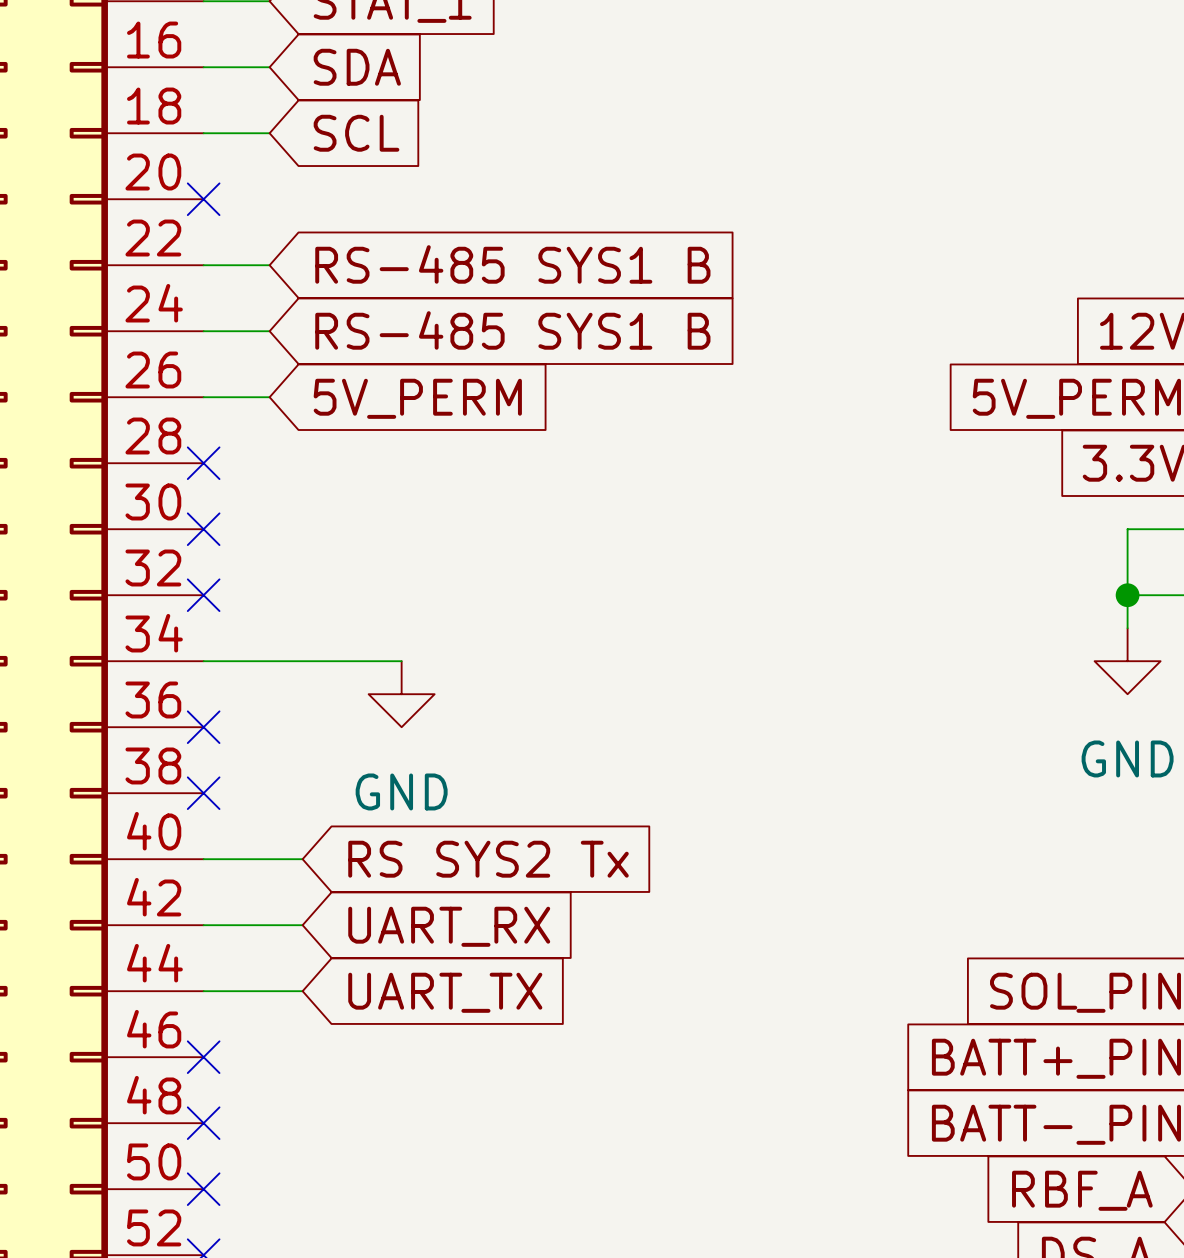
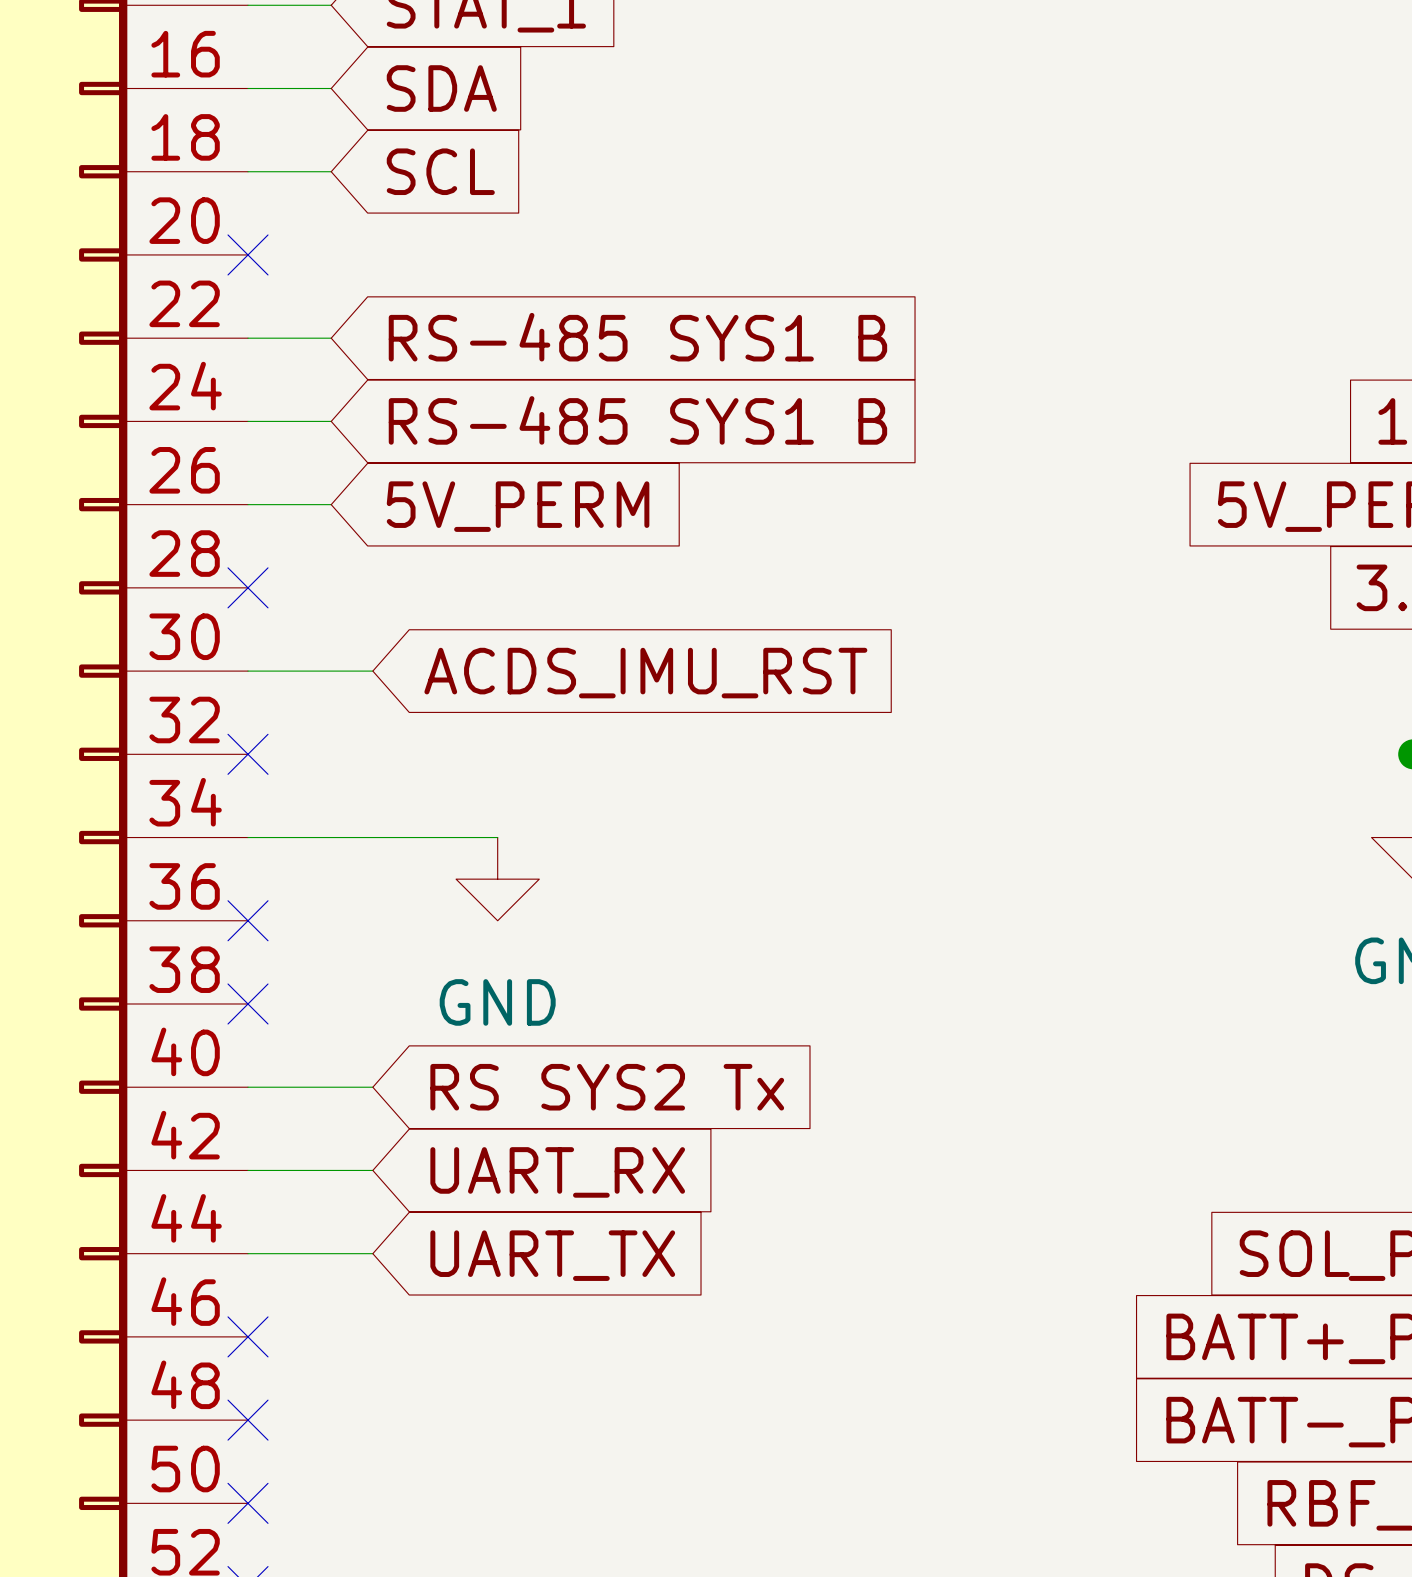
wire: none -> (248, 671) (372, 671)
no-connect mark: (203, 529) -> none
global label: none -> ACDS_IMU_RST (645, 673)

